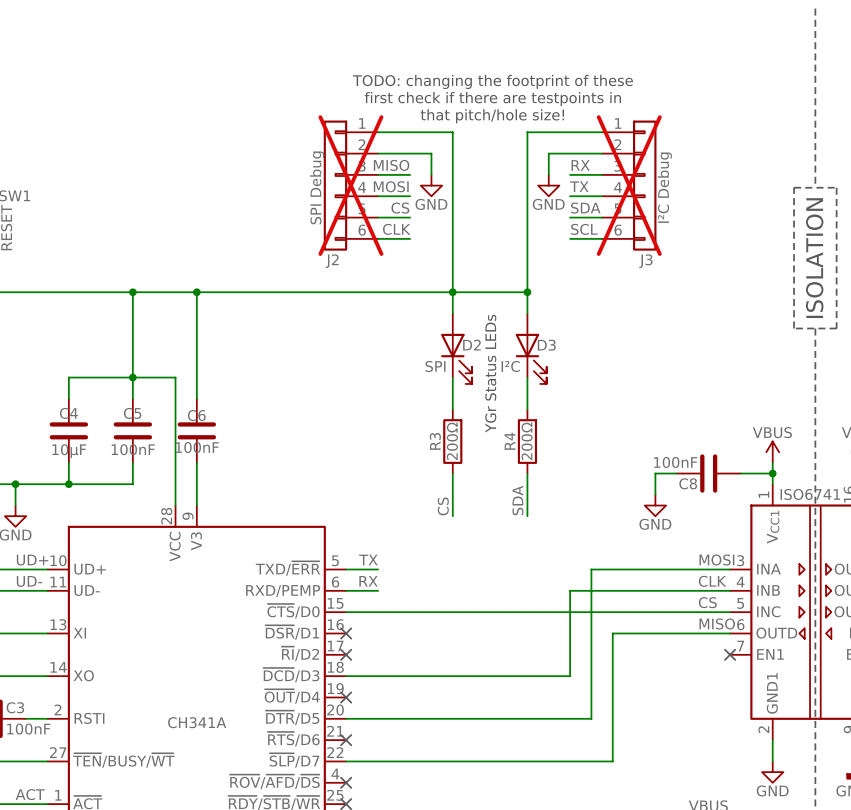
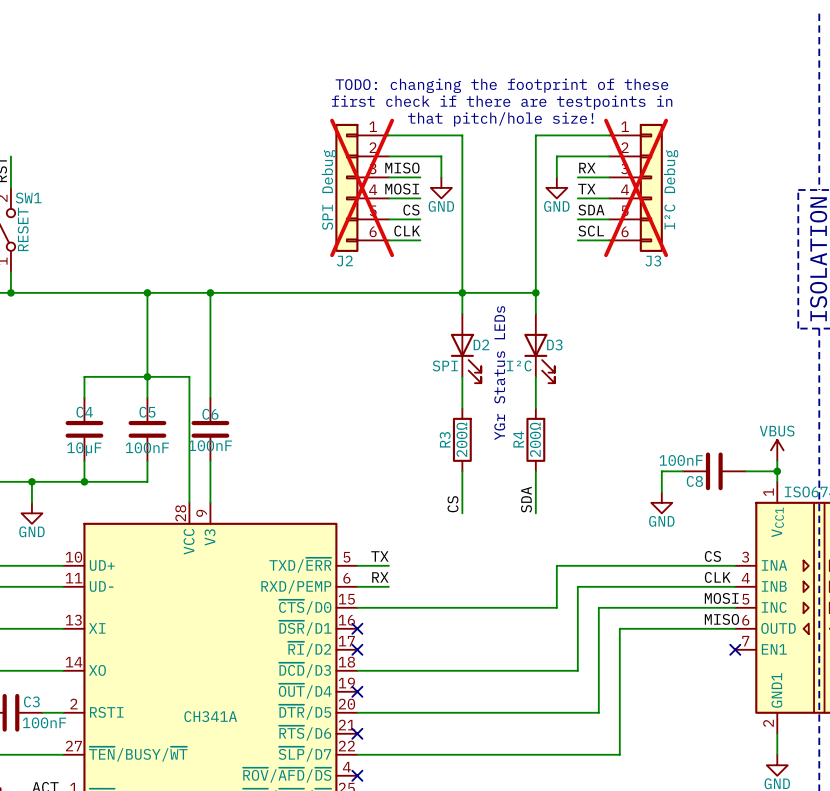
label: UD+ (32, 560) -> none
label: MOSI (716, 560) -> CS (712, 556)
wire: (591, 569) (591, 612) (548, 612) -> (598, 565) (556, 565) (556, 607)
label: UD- (29, 581) -> none
label: CS (707, 602) -> MOSI (721, 598)

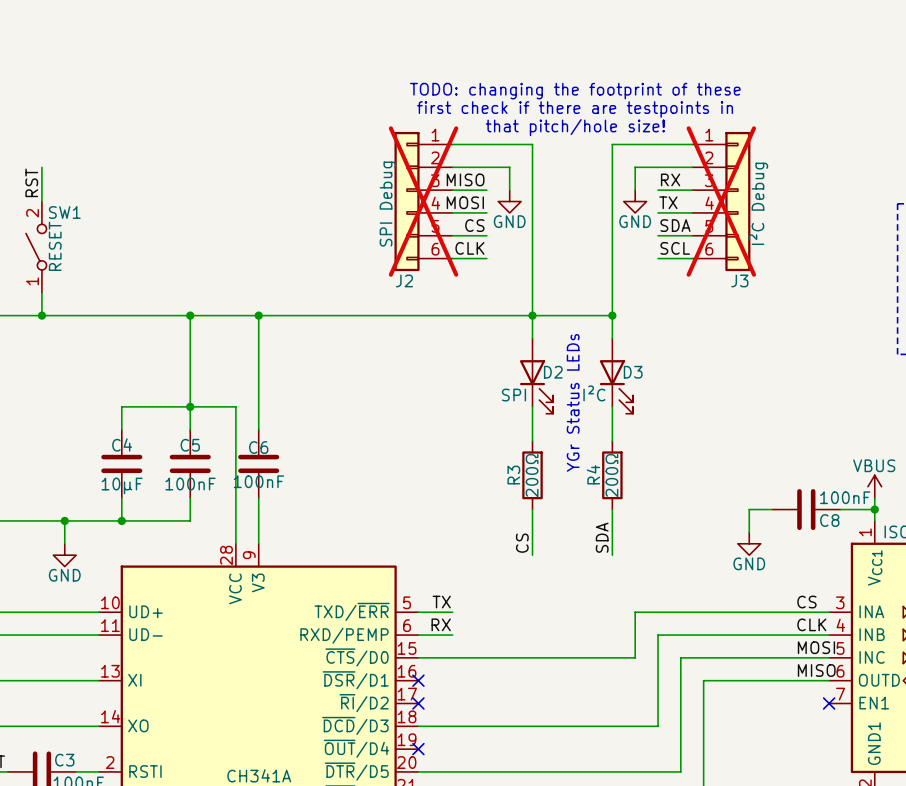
C8 value position: 100nF (681, 460) -> 100nF (845, 497)
C8 name position: C8 (694, 481) -> C8 (829, 520)

